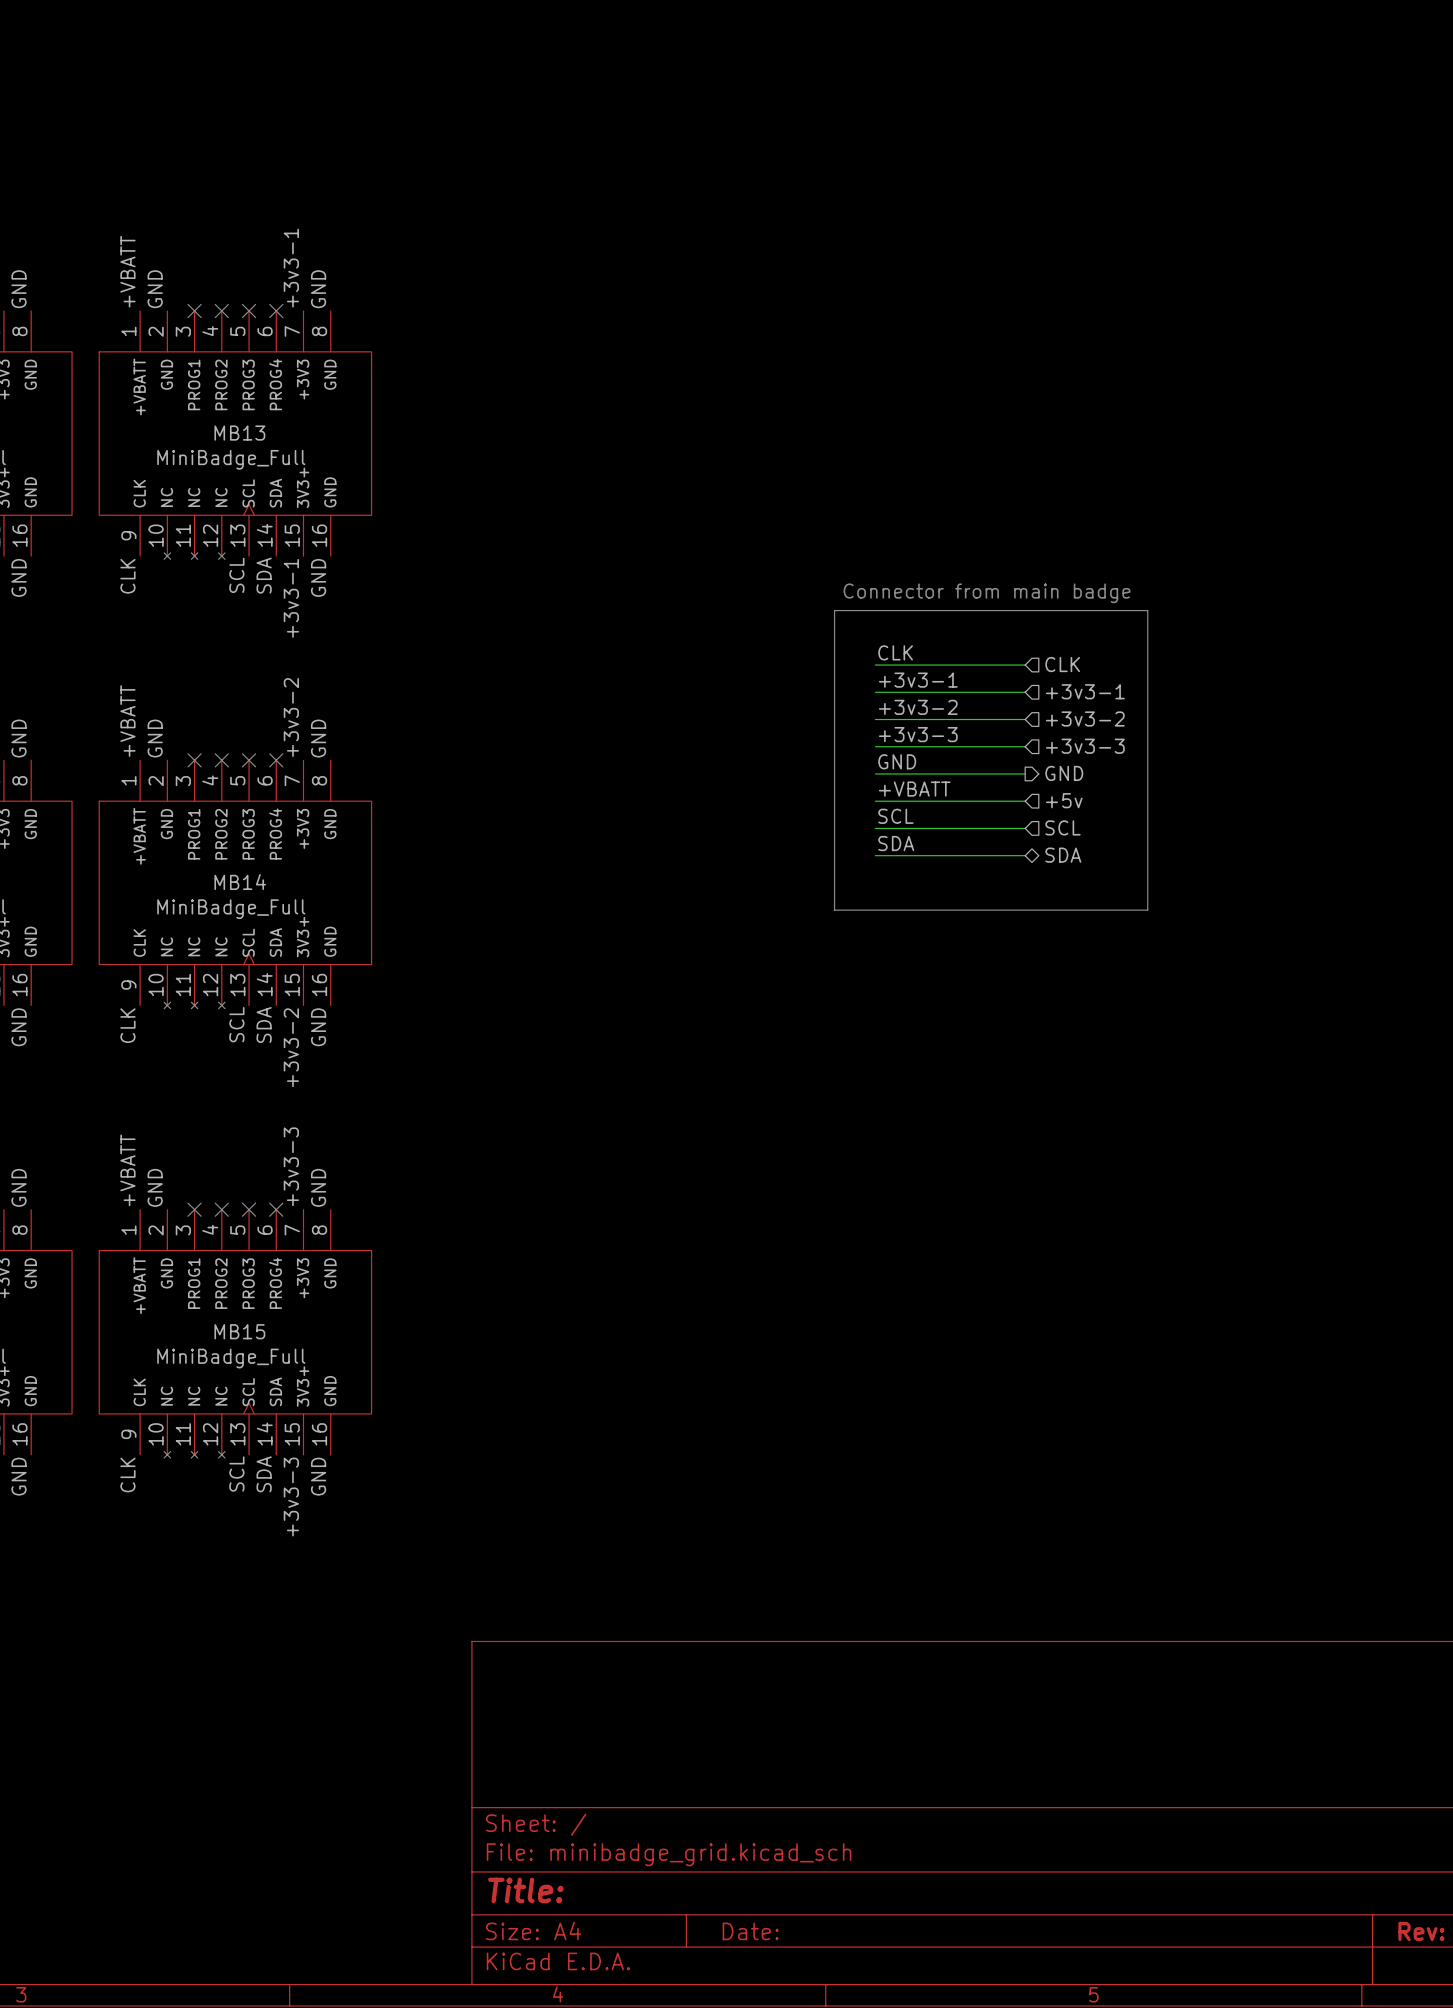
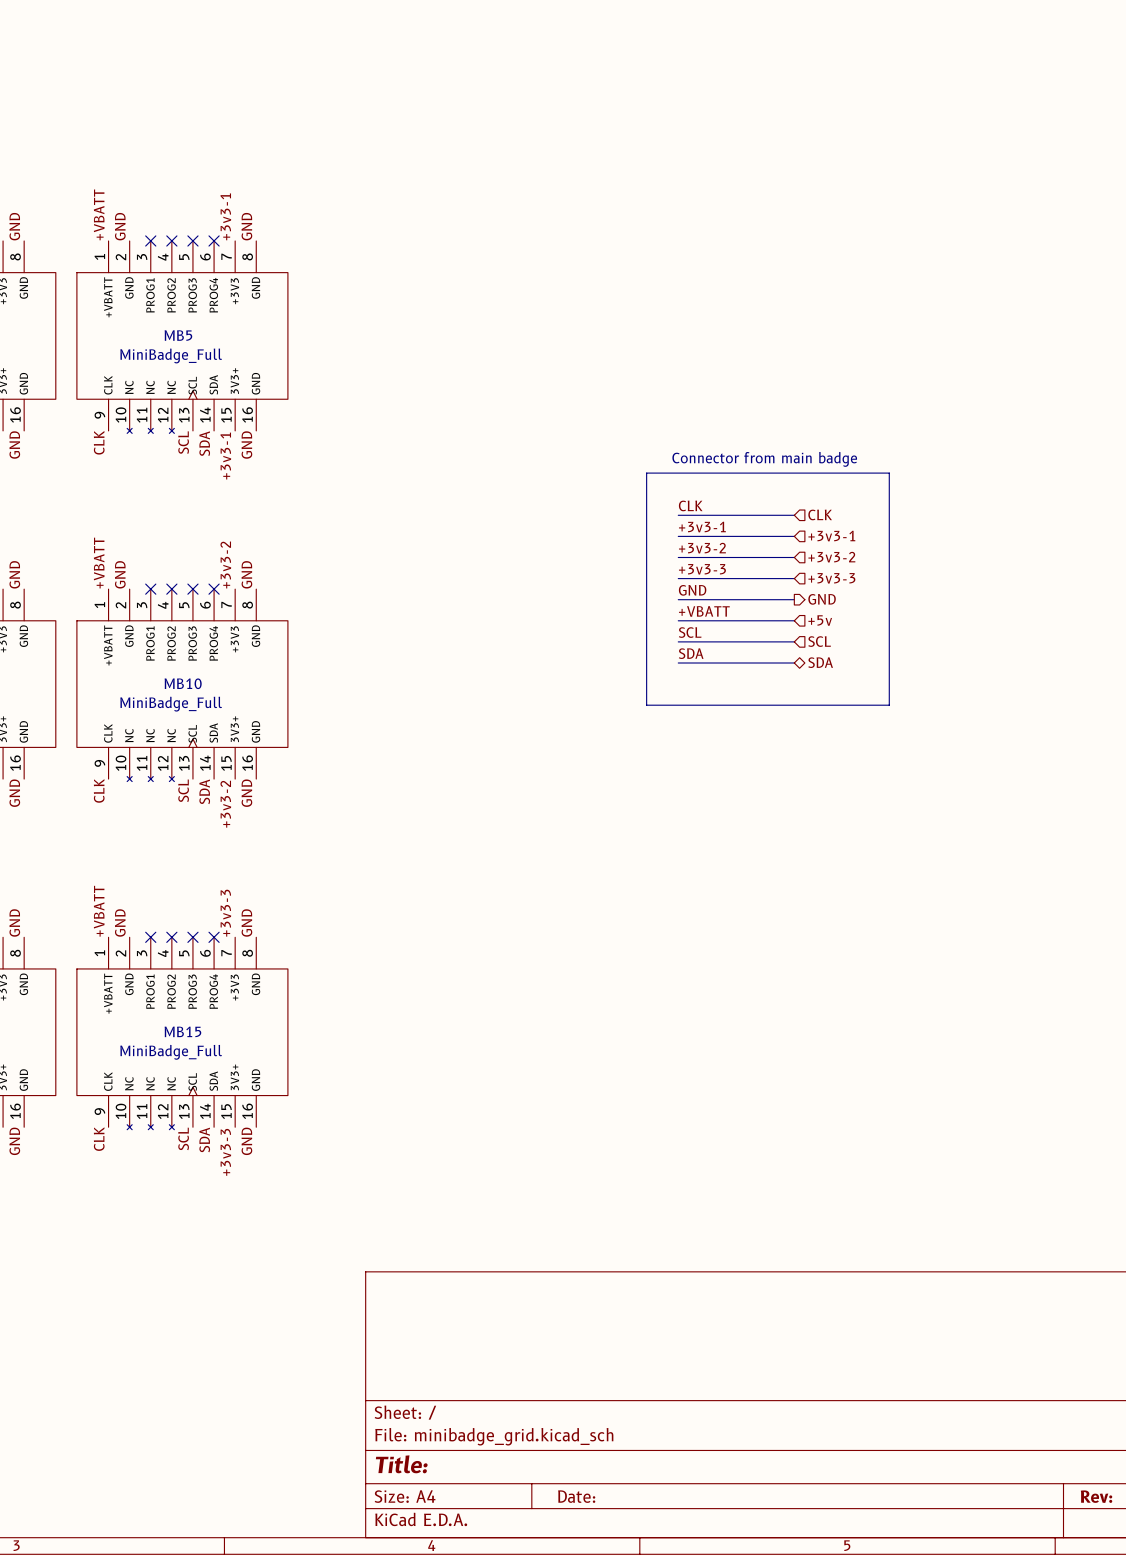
MB13 name: MB13 (239, 433) -> MB5 (178, 335)
MB14 name: MB14 (240, 882) -> MB10 (183, 683)

